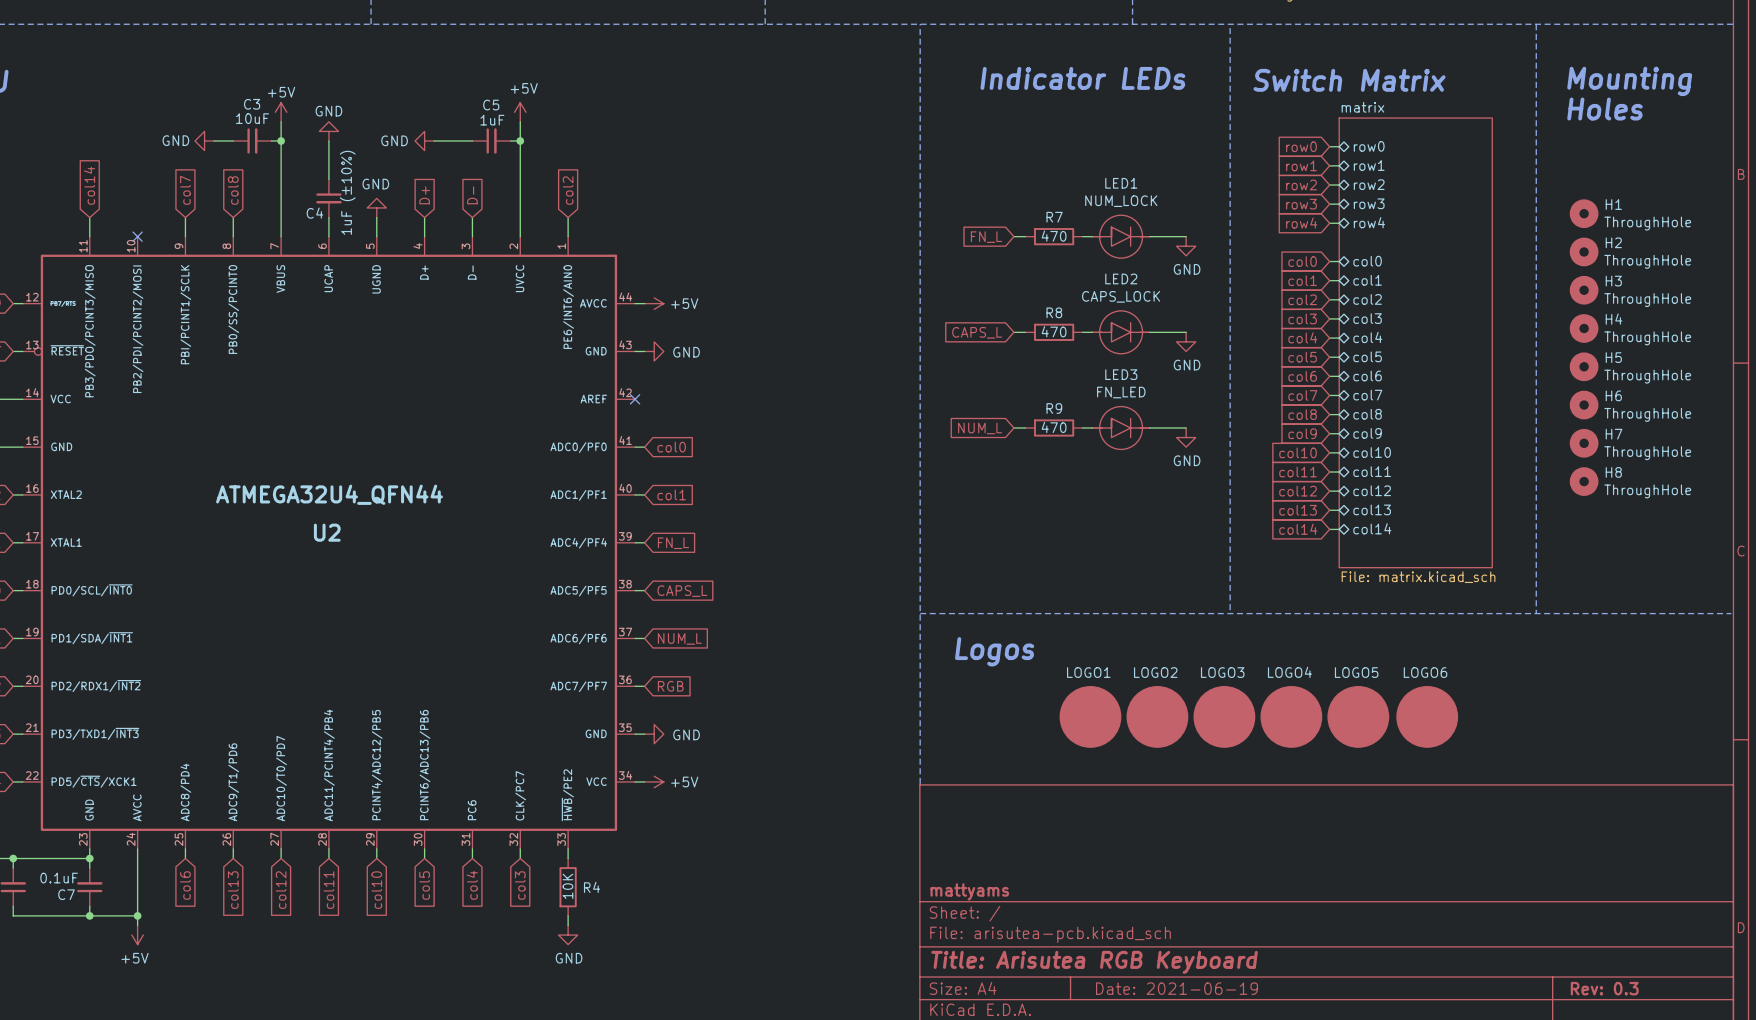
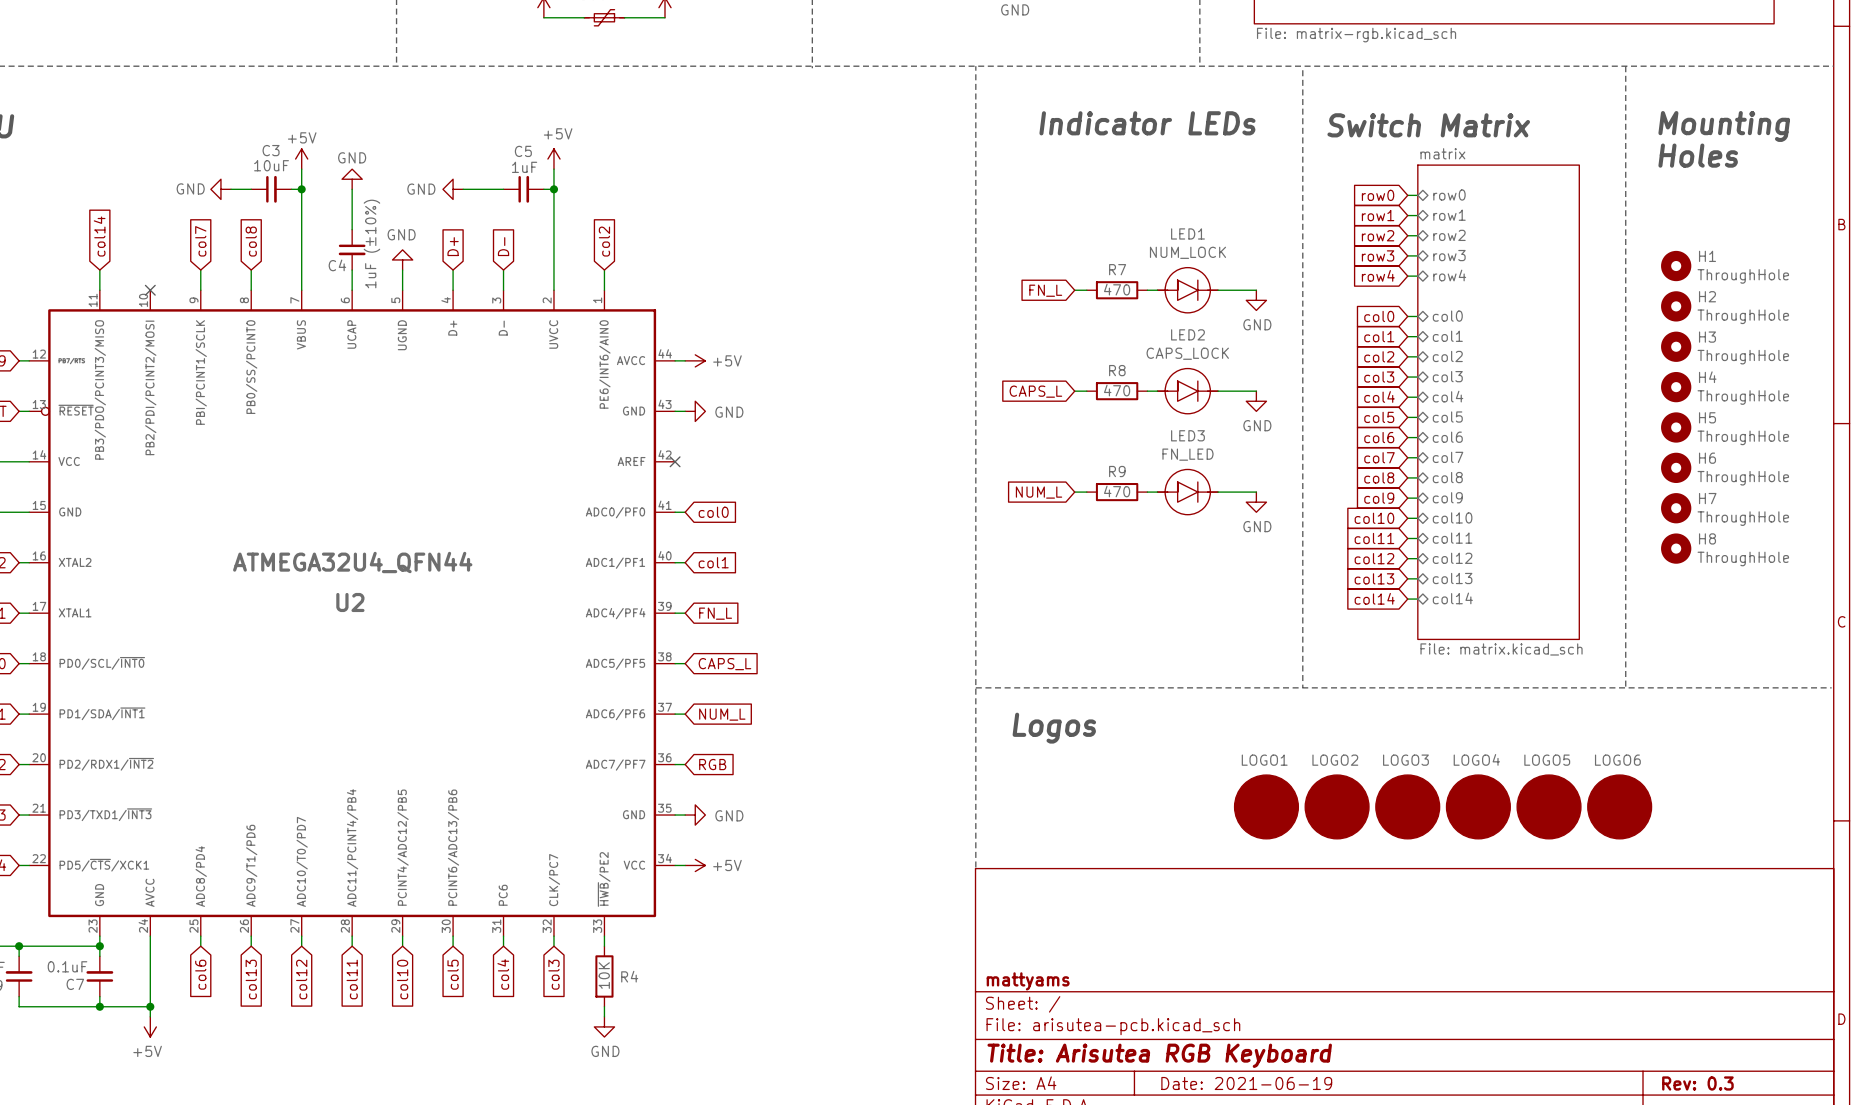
LOGO1 position: (1090, 716) -> (1266, 806)
LOGO2 position: (1157, 716) -> (1337, 806)
LOGO3 position: (1224, 716) -> (1407, 806)
LOGO4 position: (1291, 716) -> (1478, 806)
LOGO5 position: (1358, 716) -> (1549, 806)
LOGO6 position: (1427, 716) -> (1619, 806)

